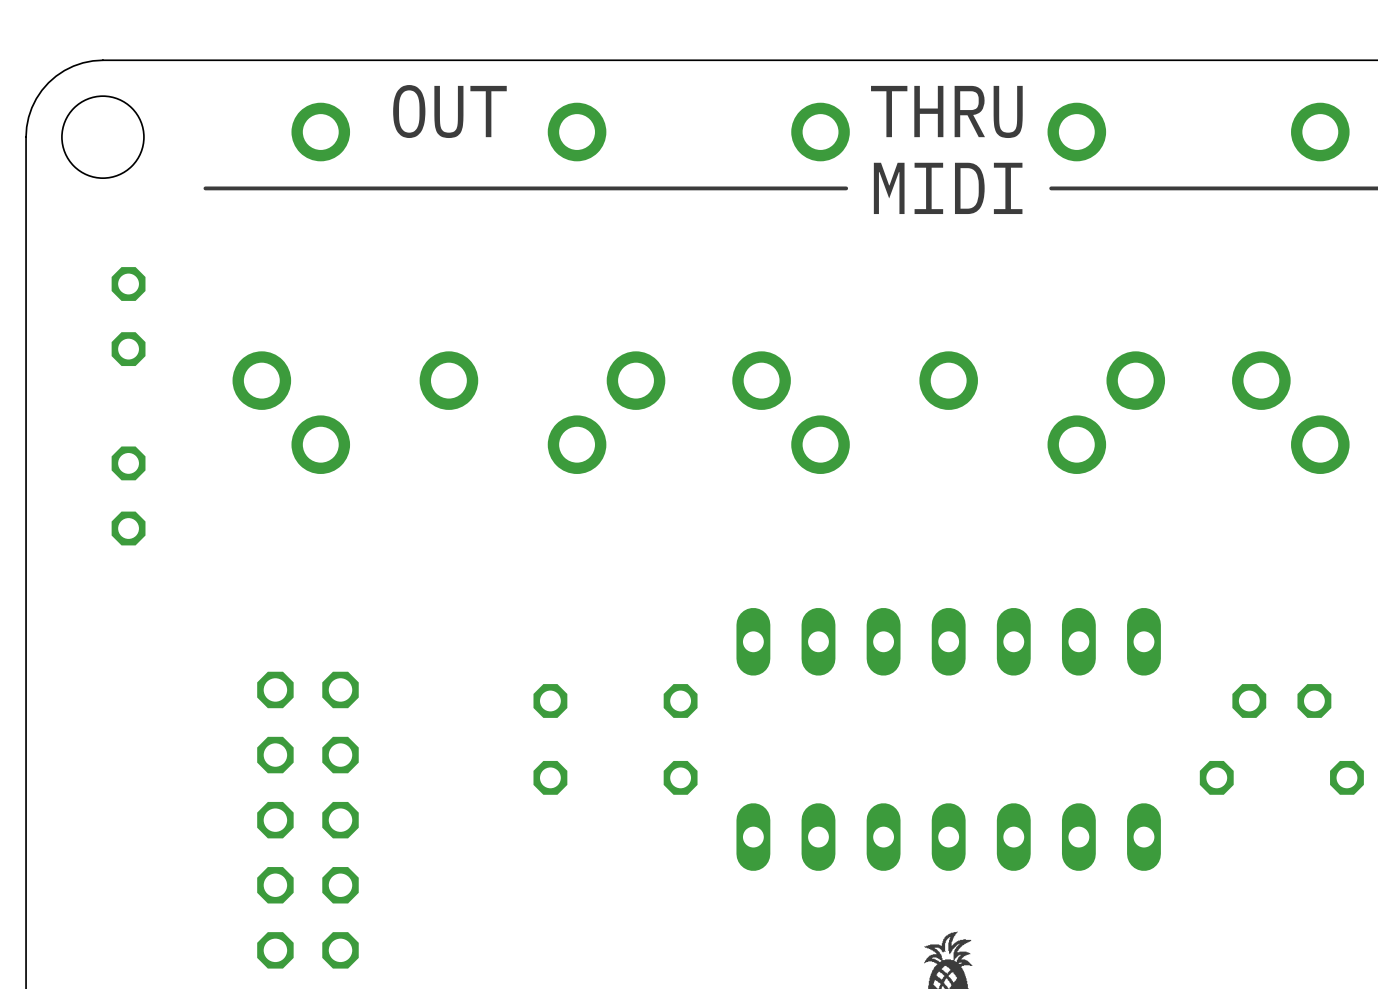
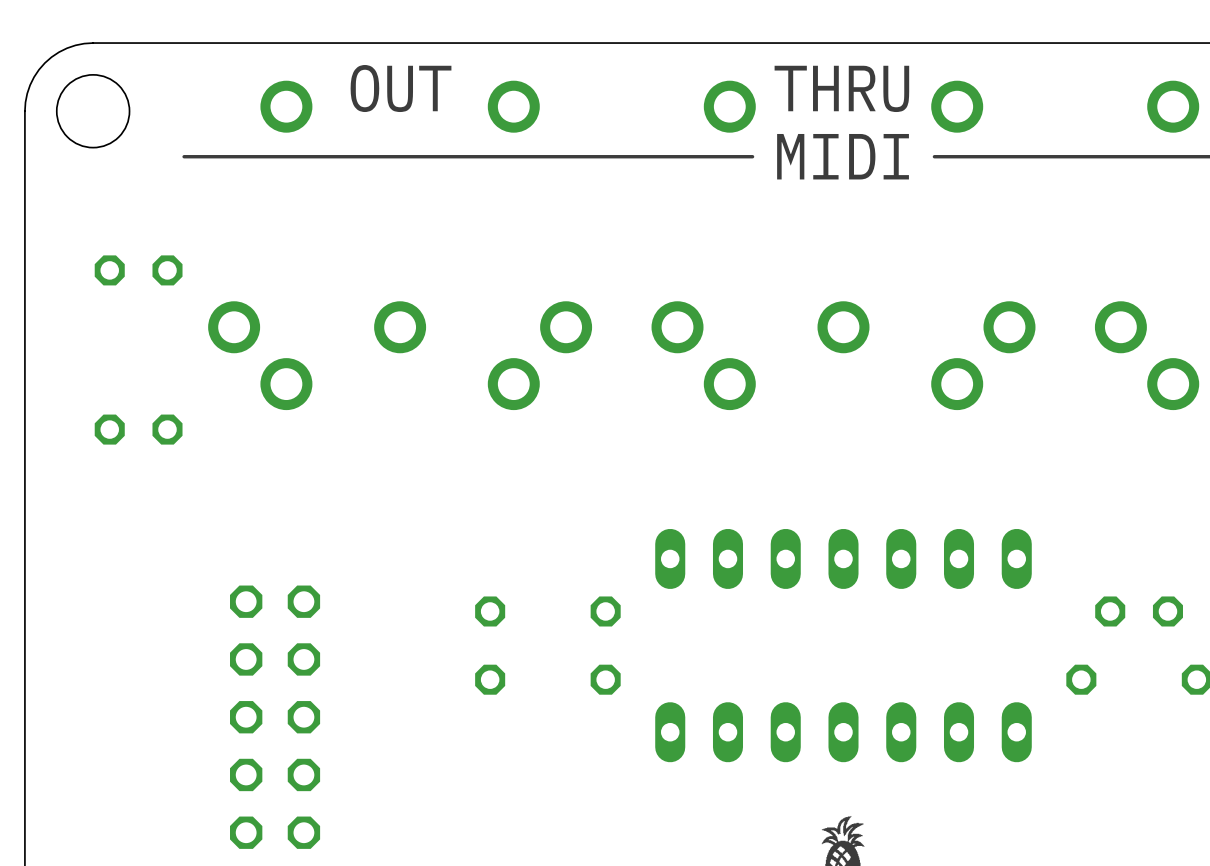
part rotation: 0° (128, 316) -> 90° clockwise (138, 270)
part rotation: 0° (128, 495) -> 90° clockwise (138, 429)

